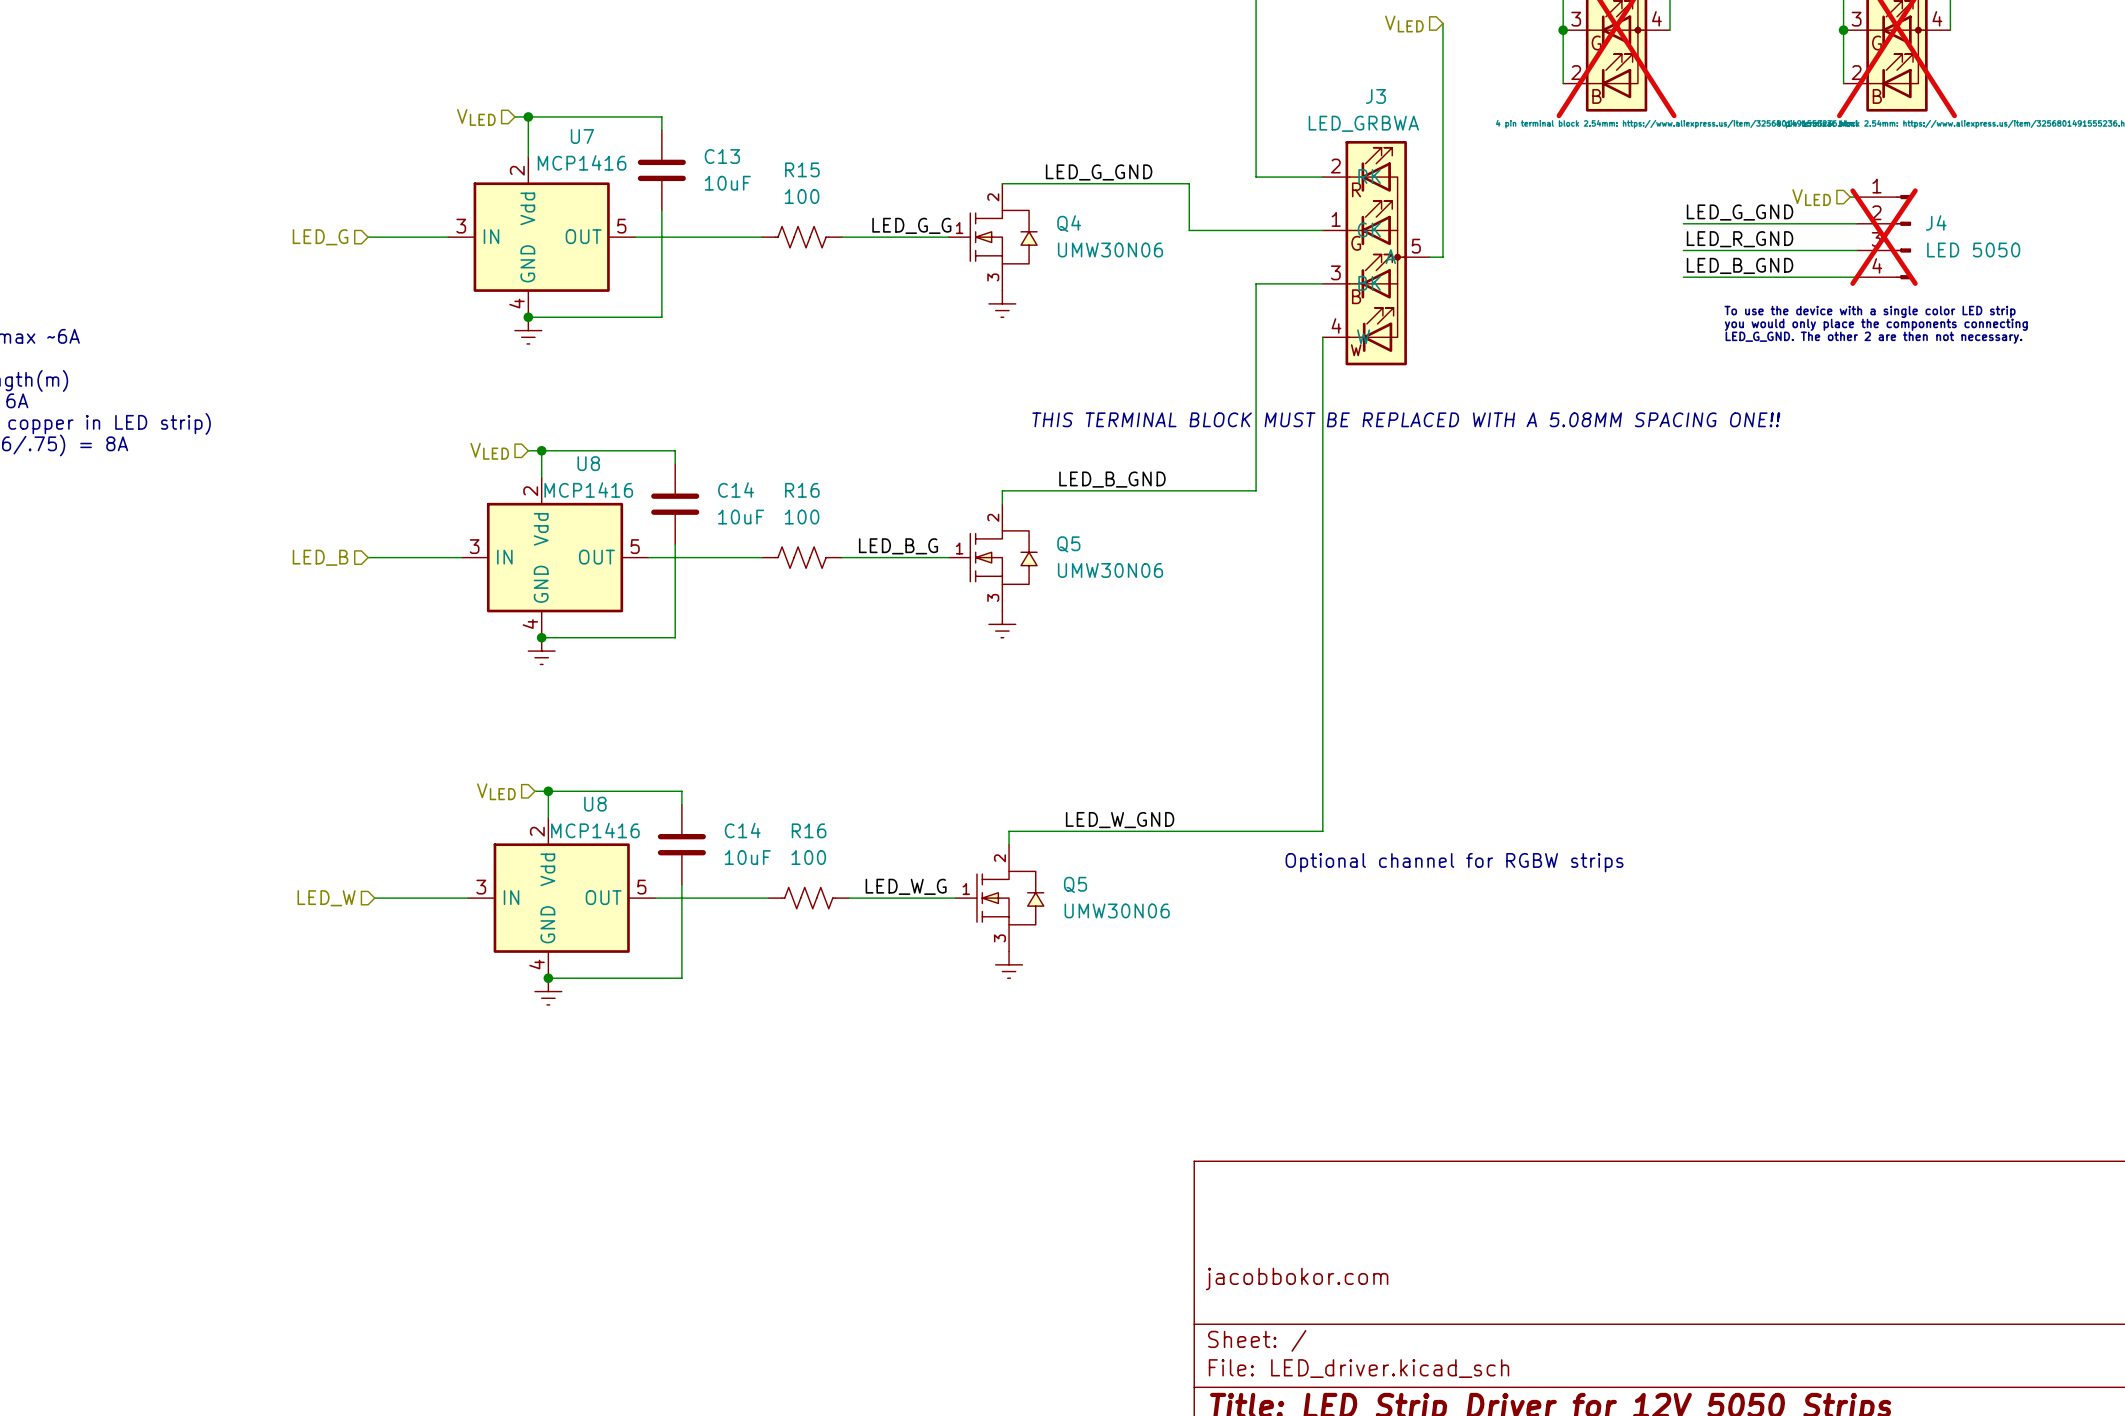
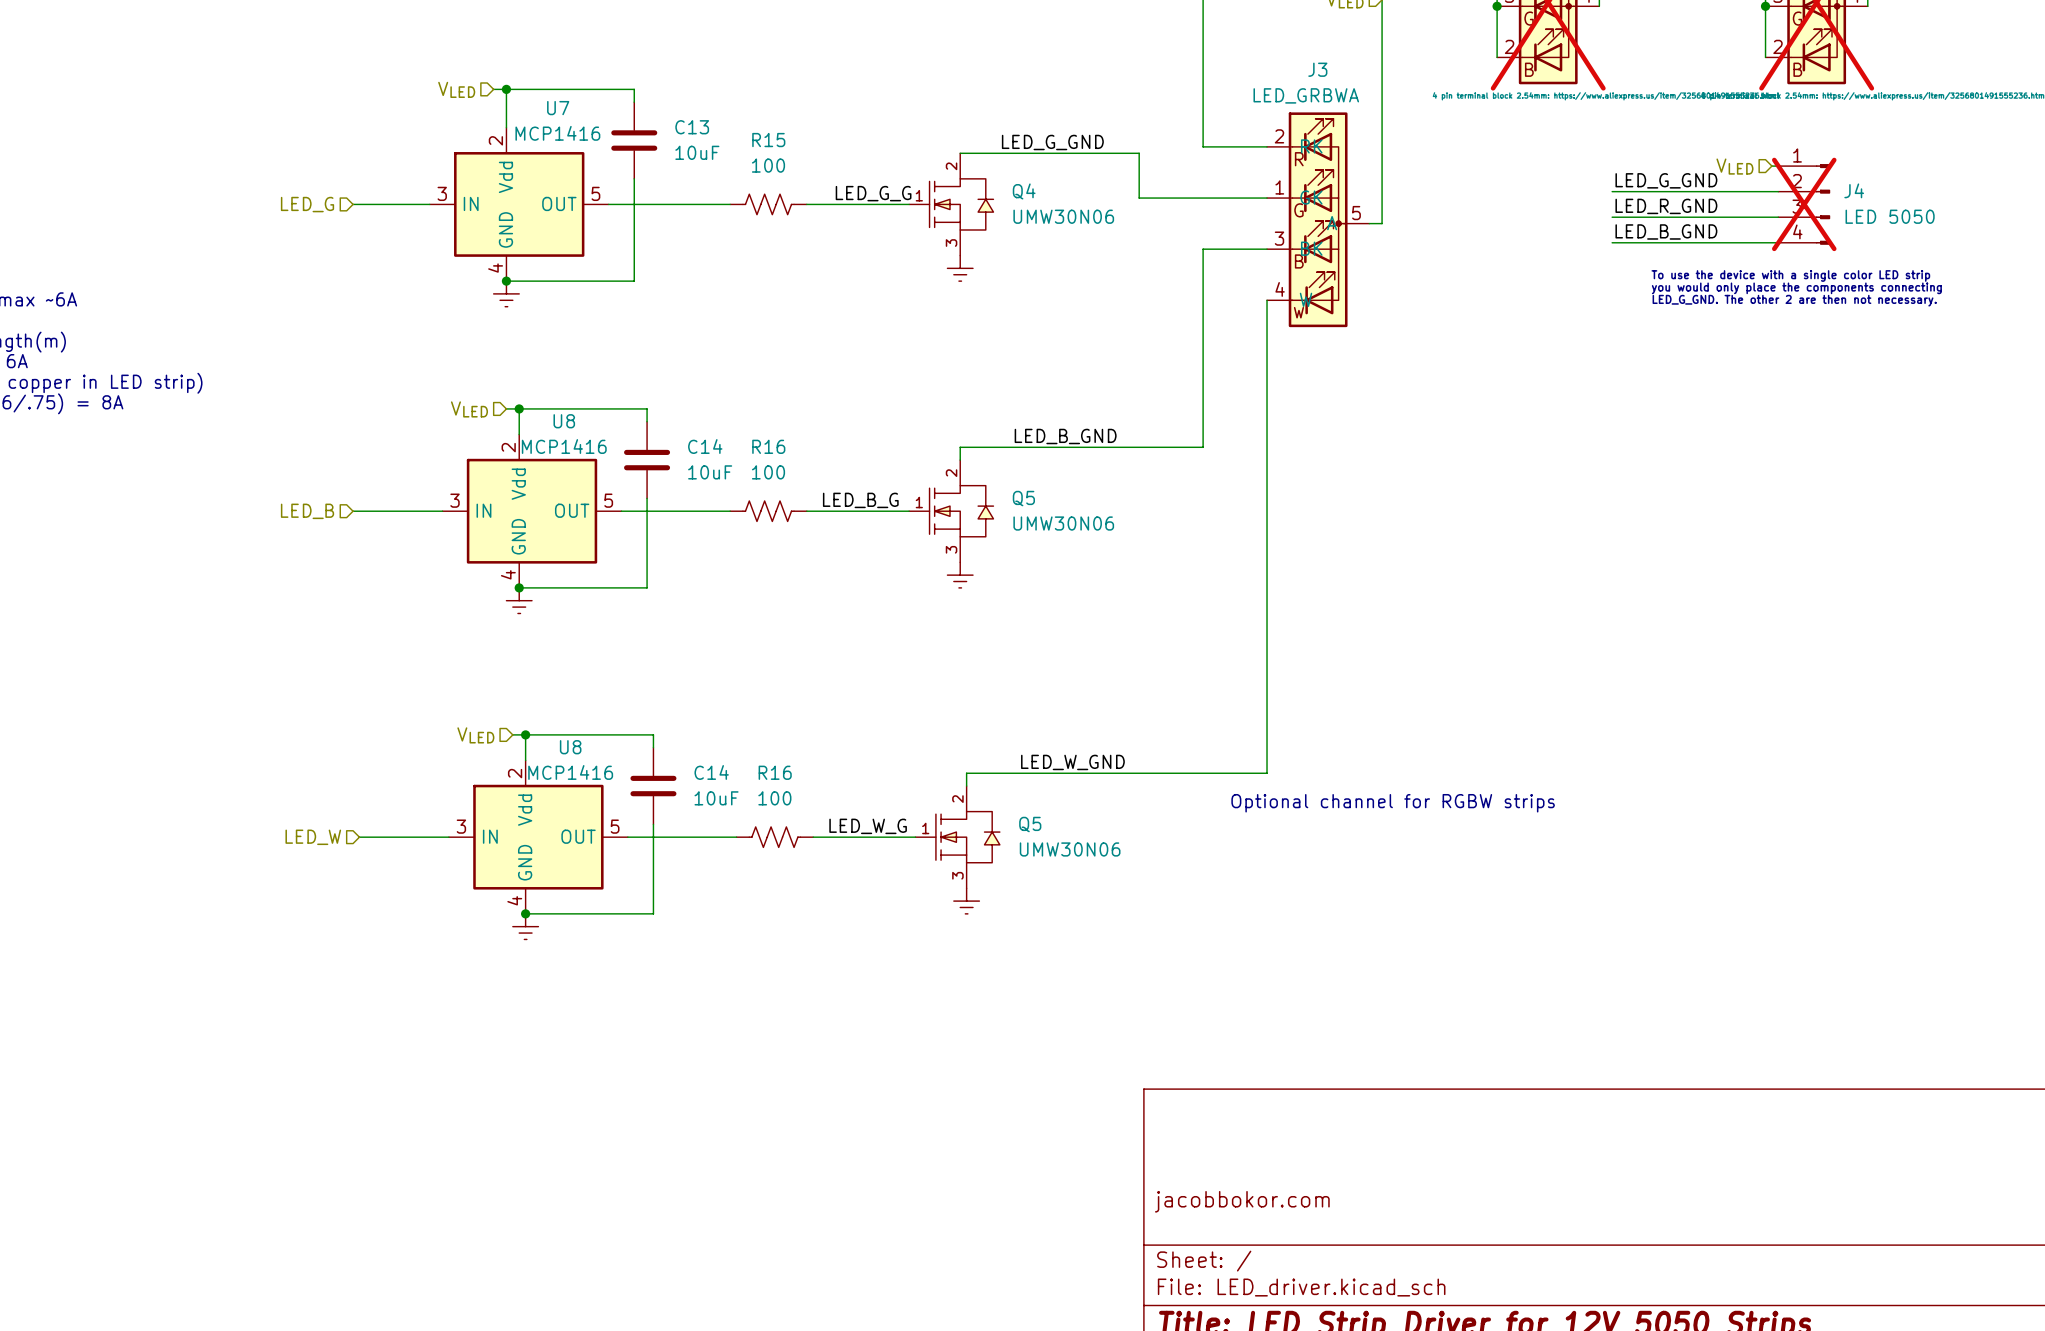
text: THIS TERMINAL BLOCK MUST BE REPLACED WITH A 5.08MM SPACING ONE!! (1406, 419) -> none

